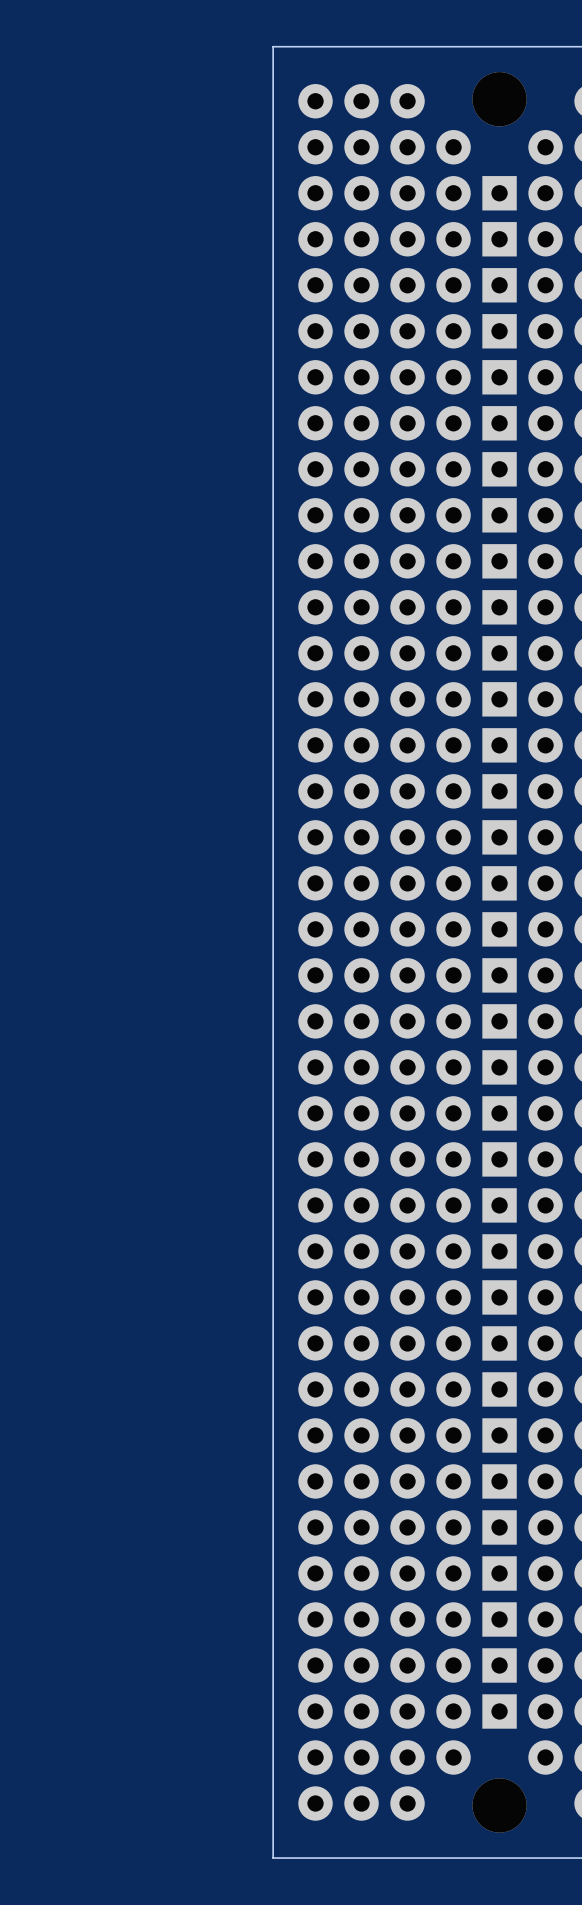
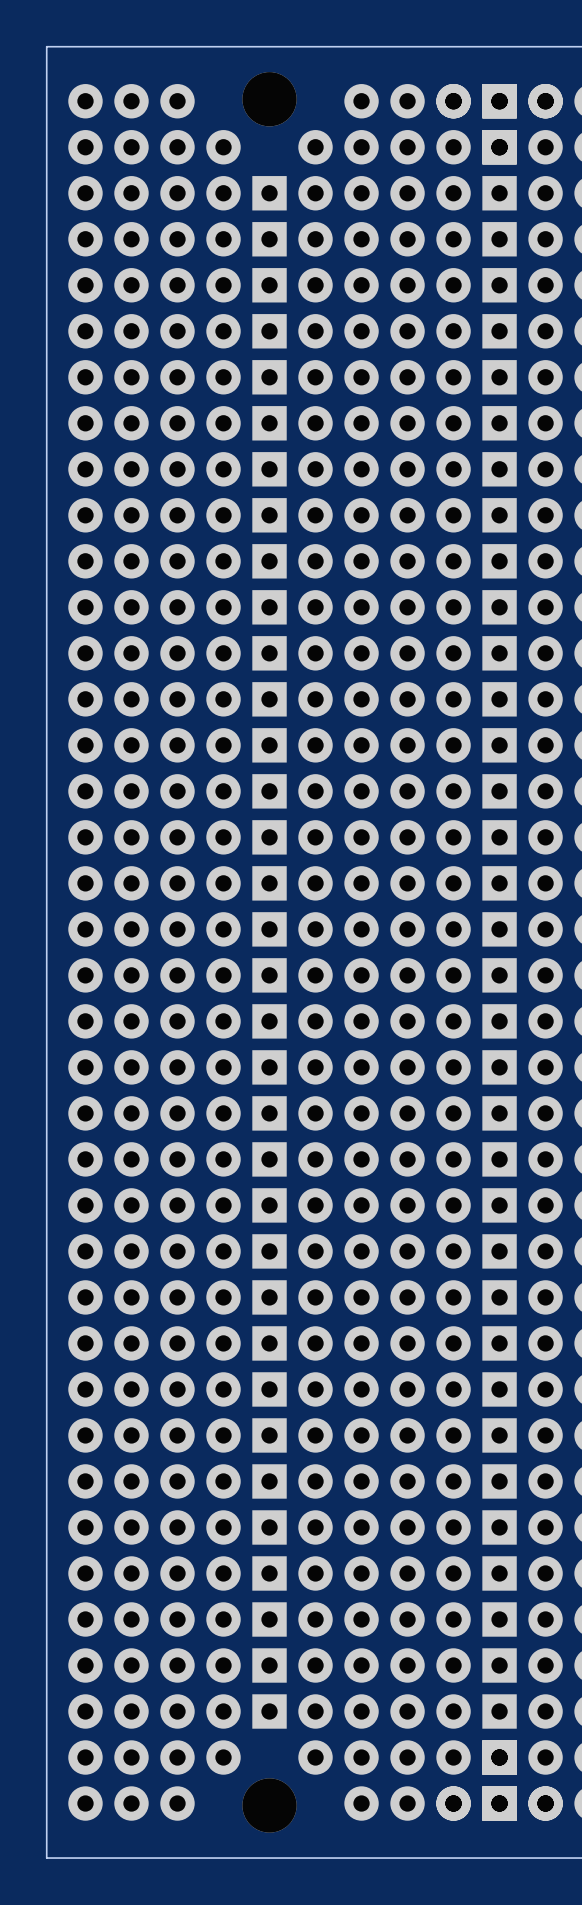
board edge: (273, 46) (273, 1858) -> (273, 46) (46, 46) (46, 1858) (273, 1858)
part footprint: [472, 72, 527, 127] -> [482, 84, 517, 119]
part: none -> (269, 99)
part: none -> (85, 101)
part: none -> (131, 101)
part: none -> (177, 101)
part: (315, 101) -> none
part: none -> (453, 101)
part: none -> (545, 101)
part: none -> (85, 147)
part: none -> (131, 147)
part: none -> (177, 147)
part: none -> (223, 147)
part: none -> (499, 147)
part: none -> (85, 193)
part: none -> (131, 193)
part: none -> (177, 193)
part: none -> (223, 193)
part: none -> (269, 193)
part: none -> (85, 239)
part: none -> (131, 239)
part: none -> (177, 239)
part: none -> (223, 239)
part: none -> (269, 239)
part: none -> (85, 285)
part: none -> (131, 285)
part: none -> (177, 285)
part: none -> (223, 285)
part: none -> (269, 285)
part: none -> (85, 331)
part: none -> (131, 331)
part: none -> (177, 331)
part: none -> (223, 331)
part: none -> (269, 331)
part: none -> (85, 377)
part: none -> (131, 377)
part: none -> (177, 377)
part: none -> (223, 377)
part: none -> (269, 377)
part: none -> (85, 423)
part: none -> (131, 423)
part: none -> (177, 423)
part: none -> (223, 423)
part: none -> (269, 423)
part: none -> (85, 469)
part: none -> (131, 469)
part: none -> (177, 469)
part: none -> (223, 469)
part: none -> (269, 469)
part: none -> (85, 515)
part: none -> (131, 515)
part: none -> (177, 515)
part: none -> (223, 515)
part: none -> (269, 515)
part: none -> (85, 561)
part: none -> (131, 561)
part: none -> (177, 561)
part: none -> (223, 561)
part: none -> (269, 561)
part: none -> (85, 607)
part: none -> (131, 607)
part: none -> (177, 607)
part: none -> (223, 607)
part: none -> (269, 607)
part: none -> (85, 653)
part: none -> (131, 653)
part: none -> (177, 653)
part: none -> (223, 653)
part: none -> (269, 653)
part: none -> (85, 699)
part: none -> (131, 699)
part: none -> (177, 699)
part: none -> (223, 699)
part: none -> (269, 699)
part: none -> (85, 745)
part: none -> (131, 745)
part: none -> (177, 745)
part: none -> (223, 745)
part: none -> (269, 745)
part: none -> (85, 791)
part: none -> (131, 791)
part: none -> (177, 791)
part: none -> (223, 791)
part: none -> (269, 791)
part: none -> (85, 837)
part: none -> (131, 837)
part: none -> (177, 837)
part: none -> (223, 837)
part: none -> (269, 837)
part: none -> (85, 883)
part: none -> (131, 883)
part: none -> (177, 883)
part: none -> (223, 883)
part: none -> (269, 883)
part: none -> (85, 929)
part: none -> (131, 929)
part: none -> (177, 929)
part: none -> (223, 929)
part: none -> (269, 929)
part: none -> (85, 975)
part: none -> (131, 975)
part: none -> (177, 975)
part: none -> (223, 975)
part: none -> (269, 975)
part: none -> (85, 1021)
part: none -> (131, 1021)
part: none -> (177, 1021)
part: none -> (223, 1021)
part: none -> (269, 1021)
part: none -> (85, 1067)
part: none -> (131, 1067)
part: none -> (177, 1067)
part: none -> (223, 1067)
part: none -> (269, 1067)
part: none -> (85, 1113)
part: none -> (131, 1113)
part: none -> (177, 1113)
part: none -> (223, 1113)
part: none -> (269, 1113)
part: none -> (85, 1159)
part: none -> (131, 1159)
part: none -> (177, 1159)
part: none -> (223, 1159)
part: none -> (269, 1159)
part: none -> (85, 1205)
part: none -> (131, 1205)
part: none -> (177, 1205)
part: none -> (223, 1205)
part: none -> (269, 1205)
part: none -> (85, 1251)
part: none -> (131, 1251)
part: none -> (177, 1251)
part: none -> (223, 1251)
part: none -> (269, 1251)
part: none -> (85, 1297)
part: none -> (131, 1297)
part: none -> (177, 1297)
part: none -> (223, 1297)
part: none -> (269, 1297)
part: none -> (85, 1343)
part: none -> (131, 1343)
part: none -> (177, 1343)
part: none -> (223, 1343)
part: none -> (269, 1343)
part: none -> (85, 1389)
part: none -> (131, 1389)
part: none -> (177, 1389)
part: none -> (223, 1389)
part: none -> (269, 1389)
part: none -> (85, 1435)
part: none -> (131, 1435)
part: none -> (177, 1435)
part: none -> (223, 1435)
part: none -> (269, 1435)
part: none -> (85, 1481)
part: none -> (131, 1481)
part: none -> (177, 1481)
part: none -> (223, 1481)
part: none -> (269, 1481)
part: none -> (85, 1527)
part: none -> (131, 1527)
part: none -> (177, 1527)
part: none -> (223, 1527)
part: none -> (269, 1527)
part: none -> (85, 1573)
part: none -> (131, 1573)
part: none -> (177, 1573)
part: none -> (223, 1573)
part: none -> (269, 1573)
part: none -> (85, 1619)
part: none -> (131, 1619)
part: none -> (177, 1619)
part: none -> (223, 1619)
part: none -> (269, 1619)
part: none -> (85, 1665)
part: none -> (131, 1665)
part: none -> (177, 1665)
part: none -> (223, 1665)
part: none -> (269, 1665)
part: none -> (85, 1711)
part: none -> (131, 1711)
part: none -> (177, 1711)
part: none -> (223, 1711)
part: none -> (269, 1711)
part: none -> (85, 1757)
part: none -> (131, 1757)
part: none -> (177, 1757)
part: none -> (223, 1757)
part: none -> (499, 1757)
part footprint: [472, 1778, 527, 1833] -> [482, 1786, 517, 1821]
part: none -> (85, 1803)
part: none -> (131, 1803)
part: none -> (177, 1803)
part: (315, 1803) -> none
part: none -> (453, 1803)
part: none -> (545, 1803)
part: none -> (269, 1805)

